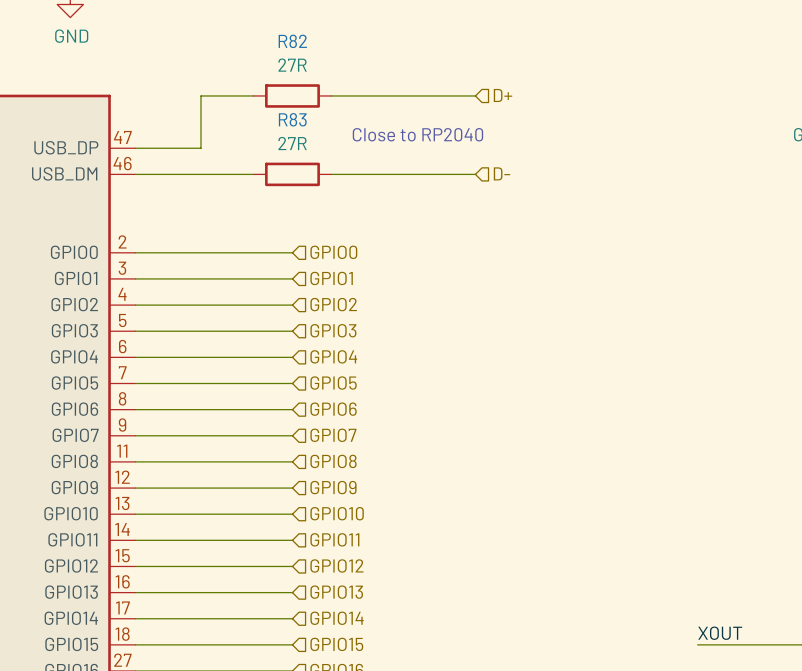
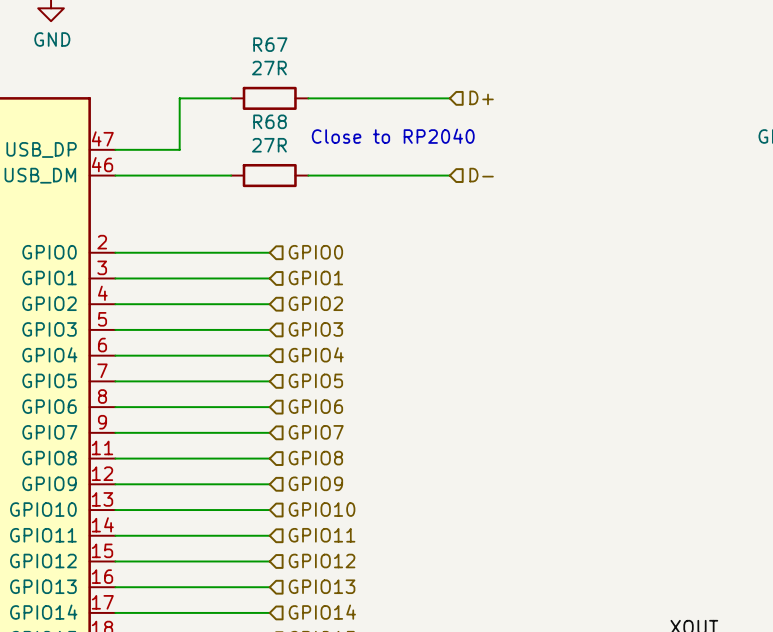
R82 name: R82 (292, 41) -> R67 (270, 44)
R83 name: R83 (292, 119) -> R68 (270, 121)

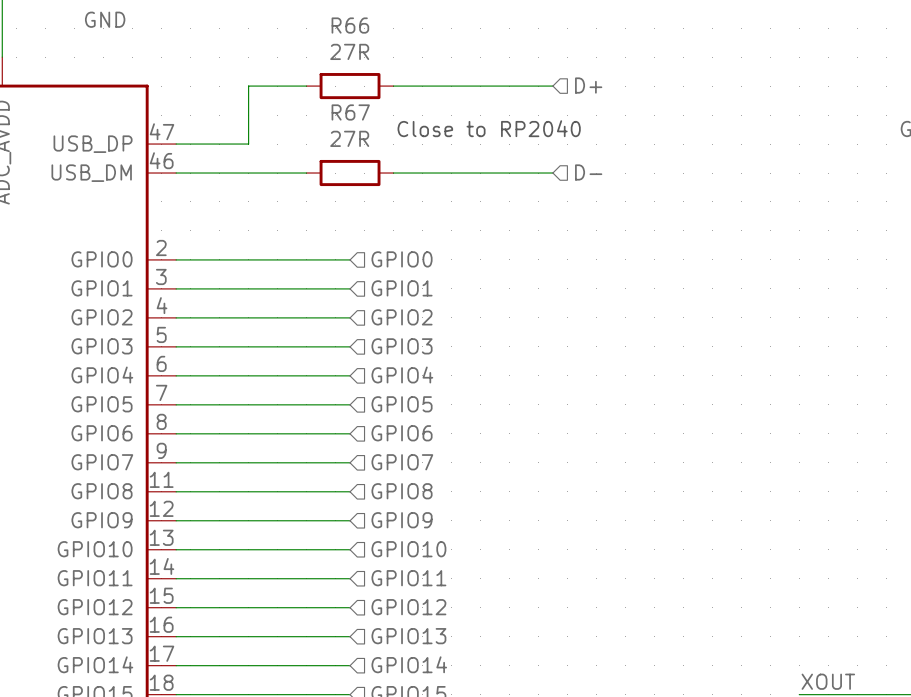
R67 name: R67 (270, 44) -> R66 (350, 25)
R68 name: R68 (270, 121) -> R67 (350, 112)

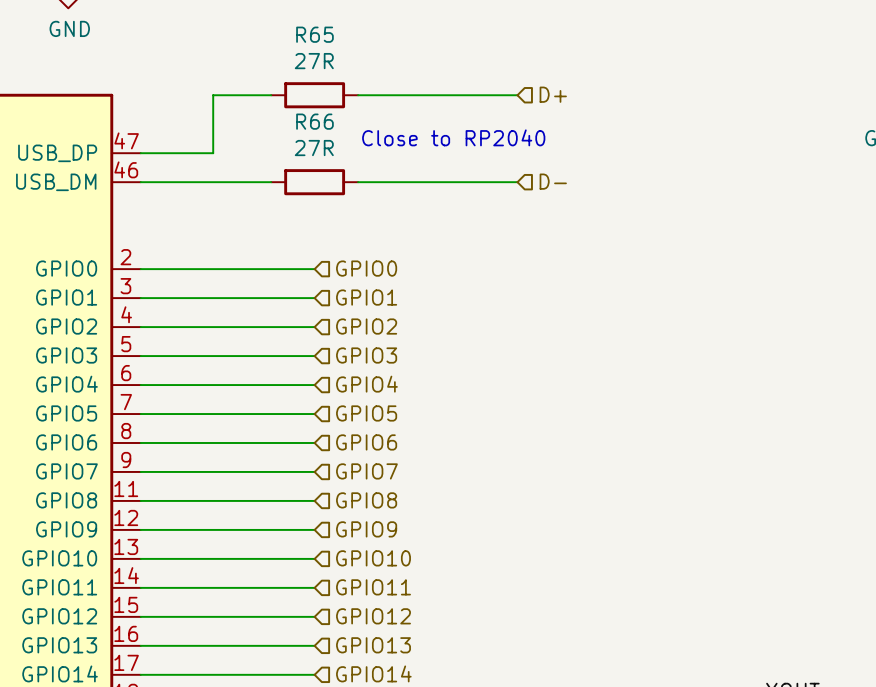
R66 name: R66 (350, 25) -> R65 (314, 34)
R67 name: R67 (350, 112) -> R66 (314, 121)

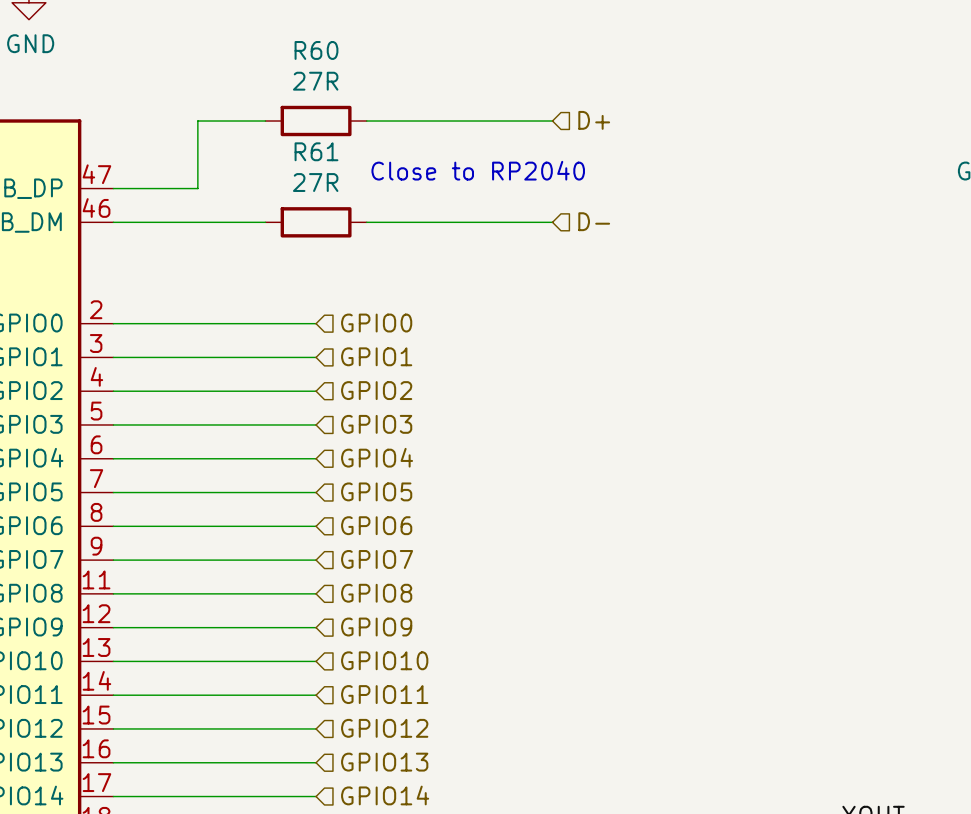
R65 name: R65 (314, 34) -> R60 (316, 50)
R66 name: R66 (314, 121) -> R61 (316, 151)

